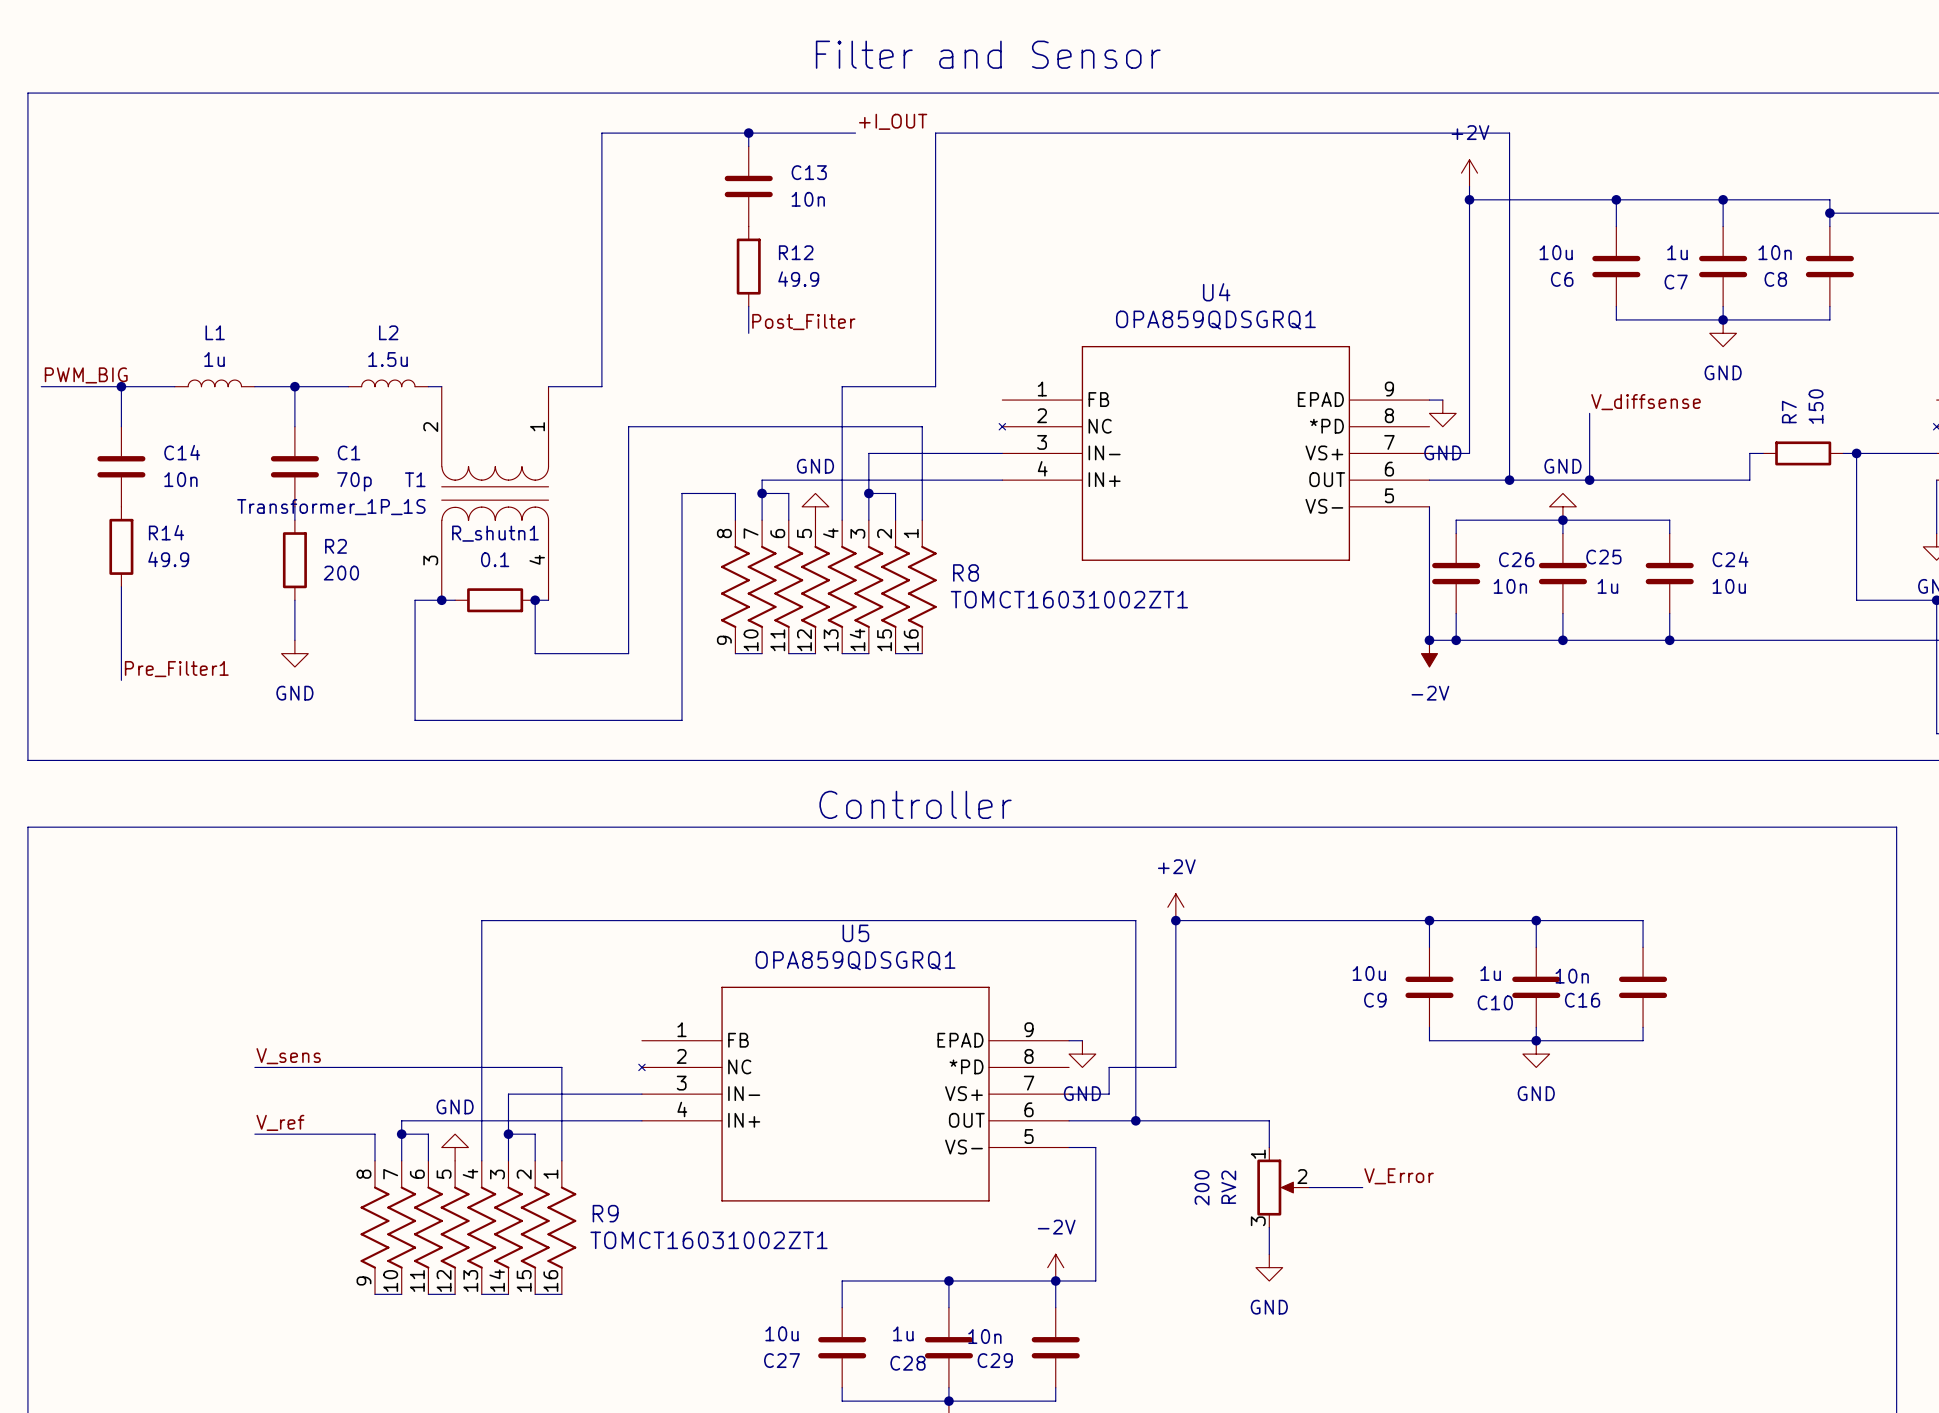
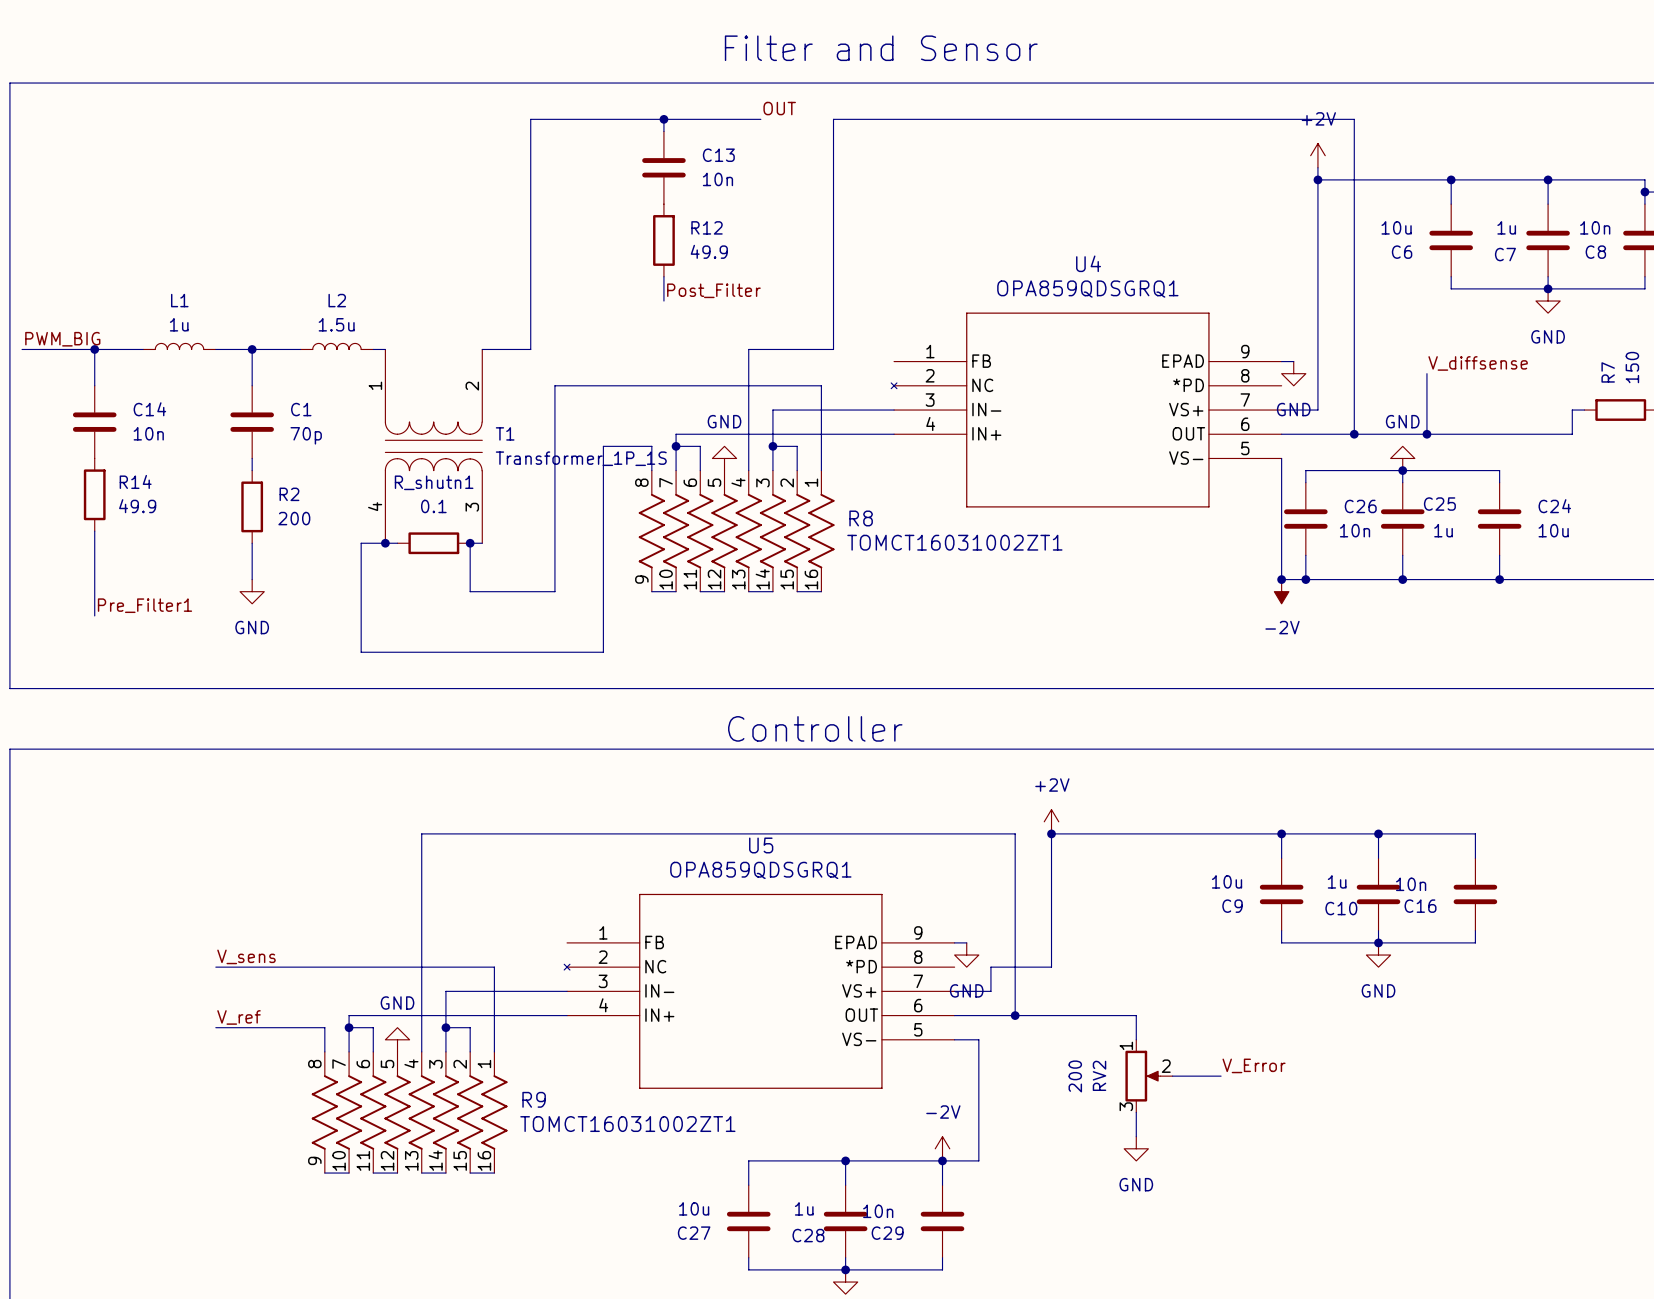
label: +I_OUT (893, 121) -> OUT (779, 108)
T1 flip: as is (495, 493) -> left-right (433, 446)

